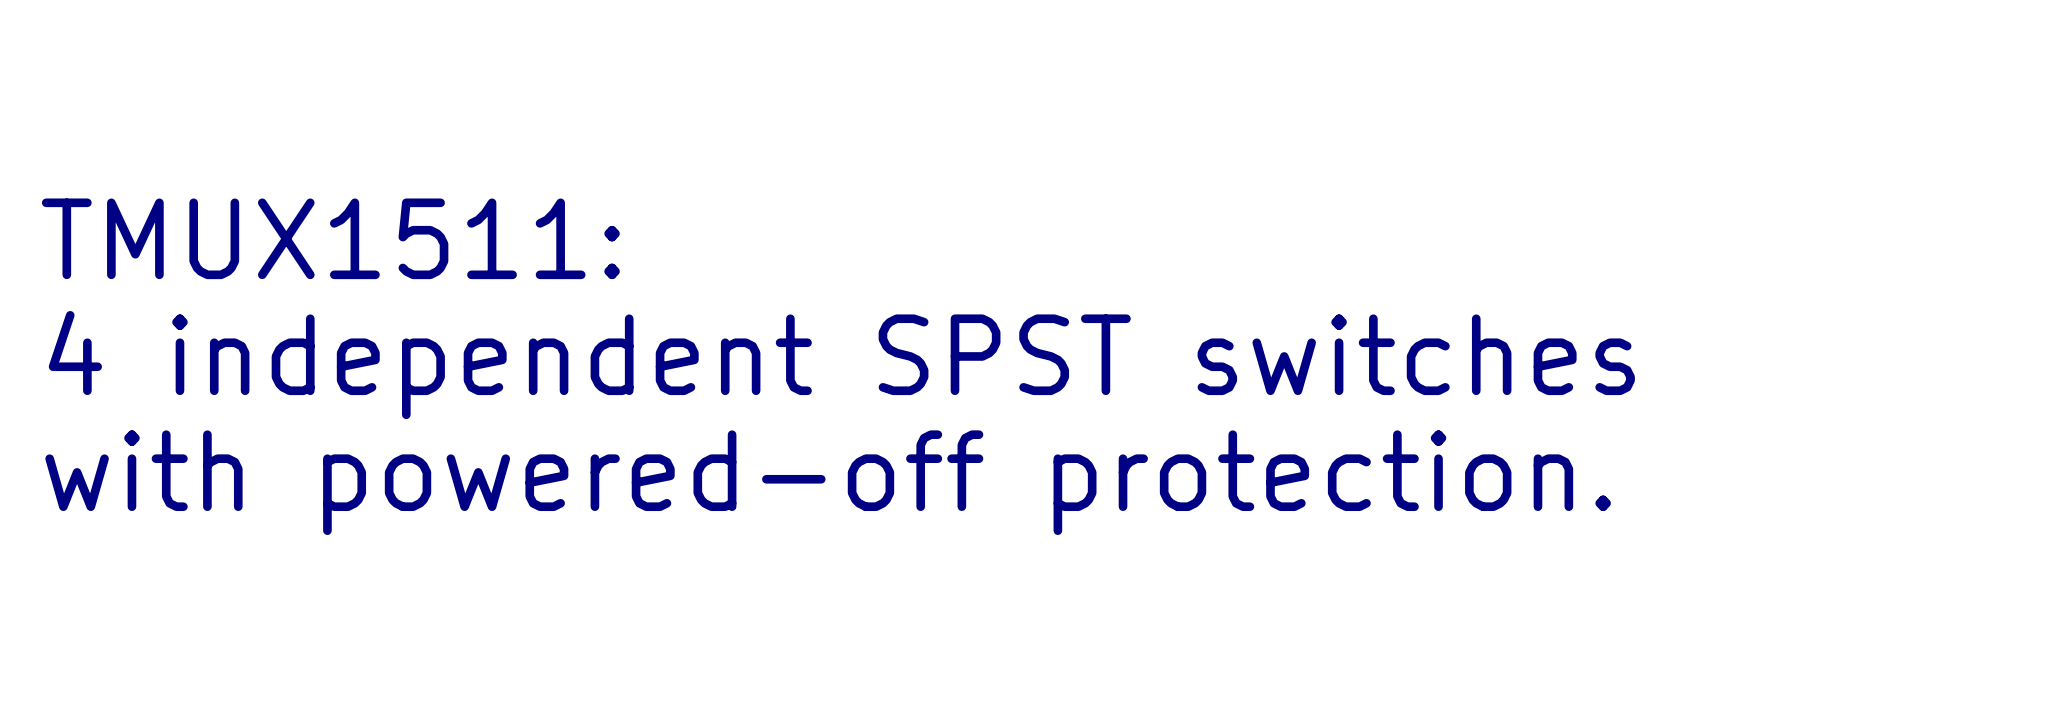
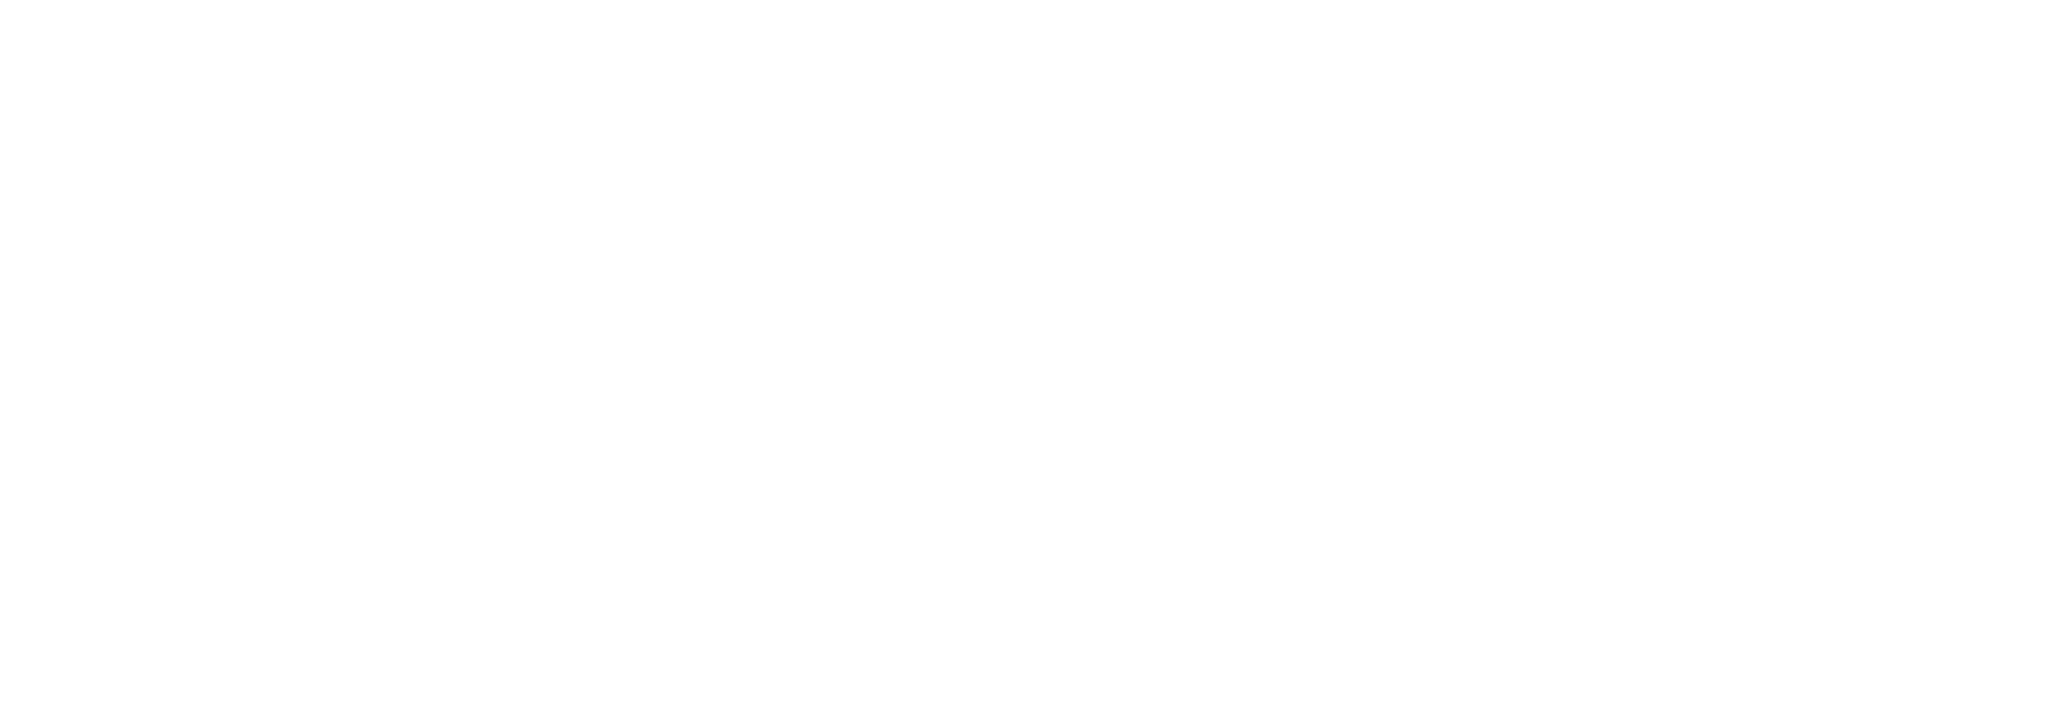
text: TMUX1511: (330, 238) -> none
text: 4 independent SPST switches (841, 365) -> none
text: with powered-off protection. (828, 482) -> none

